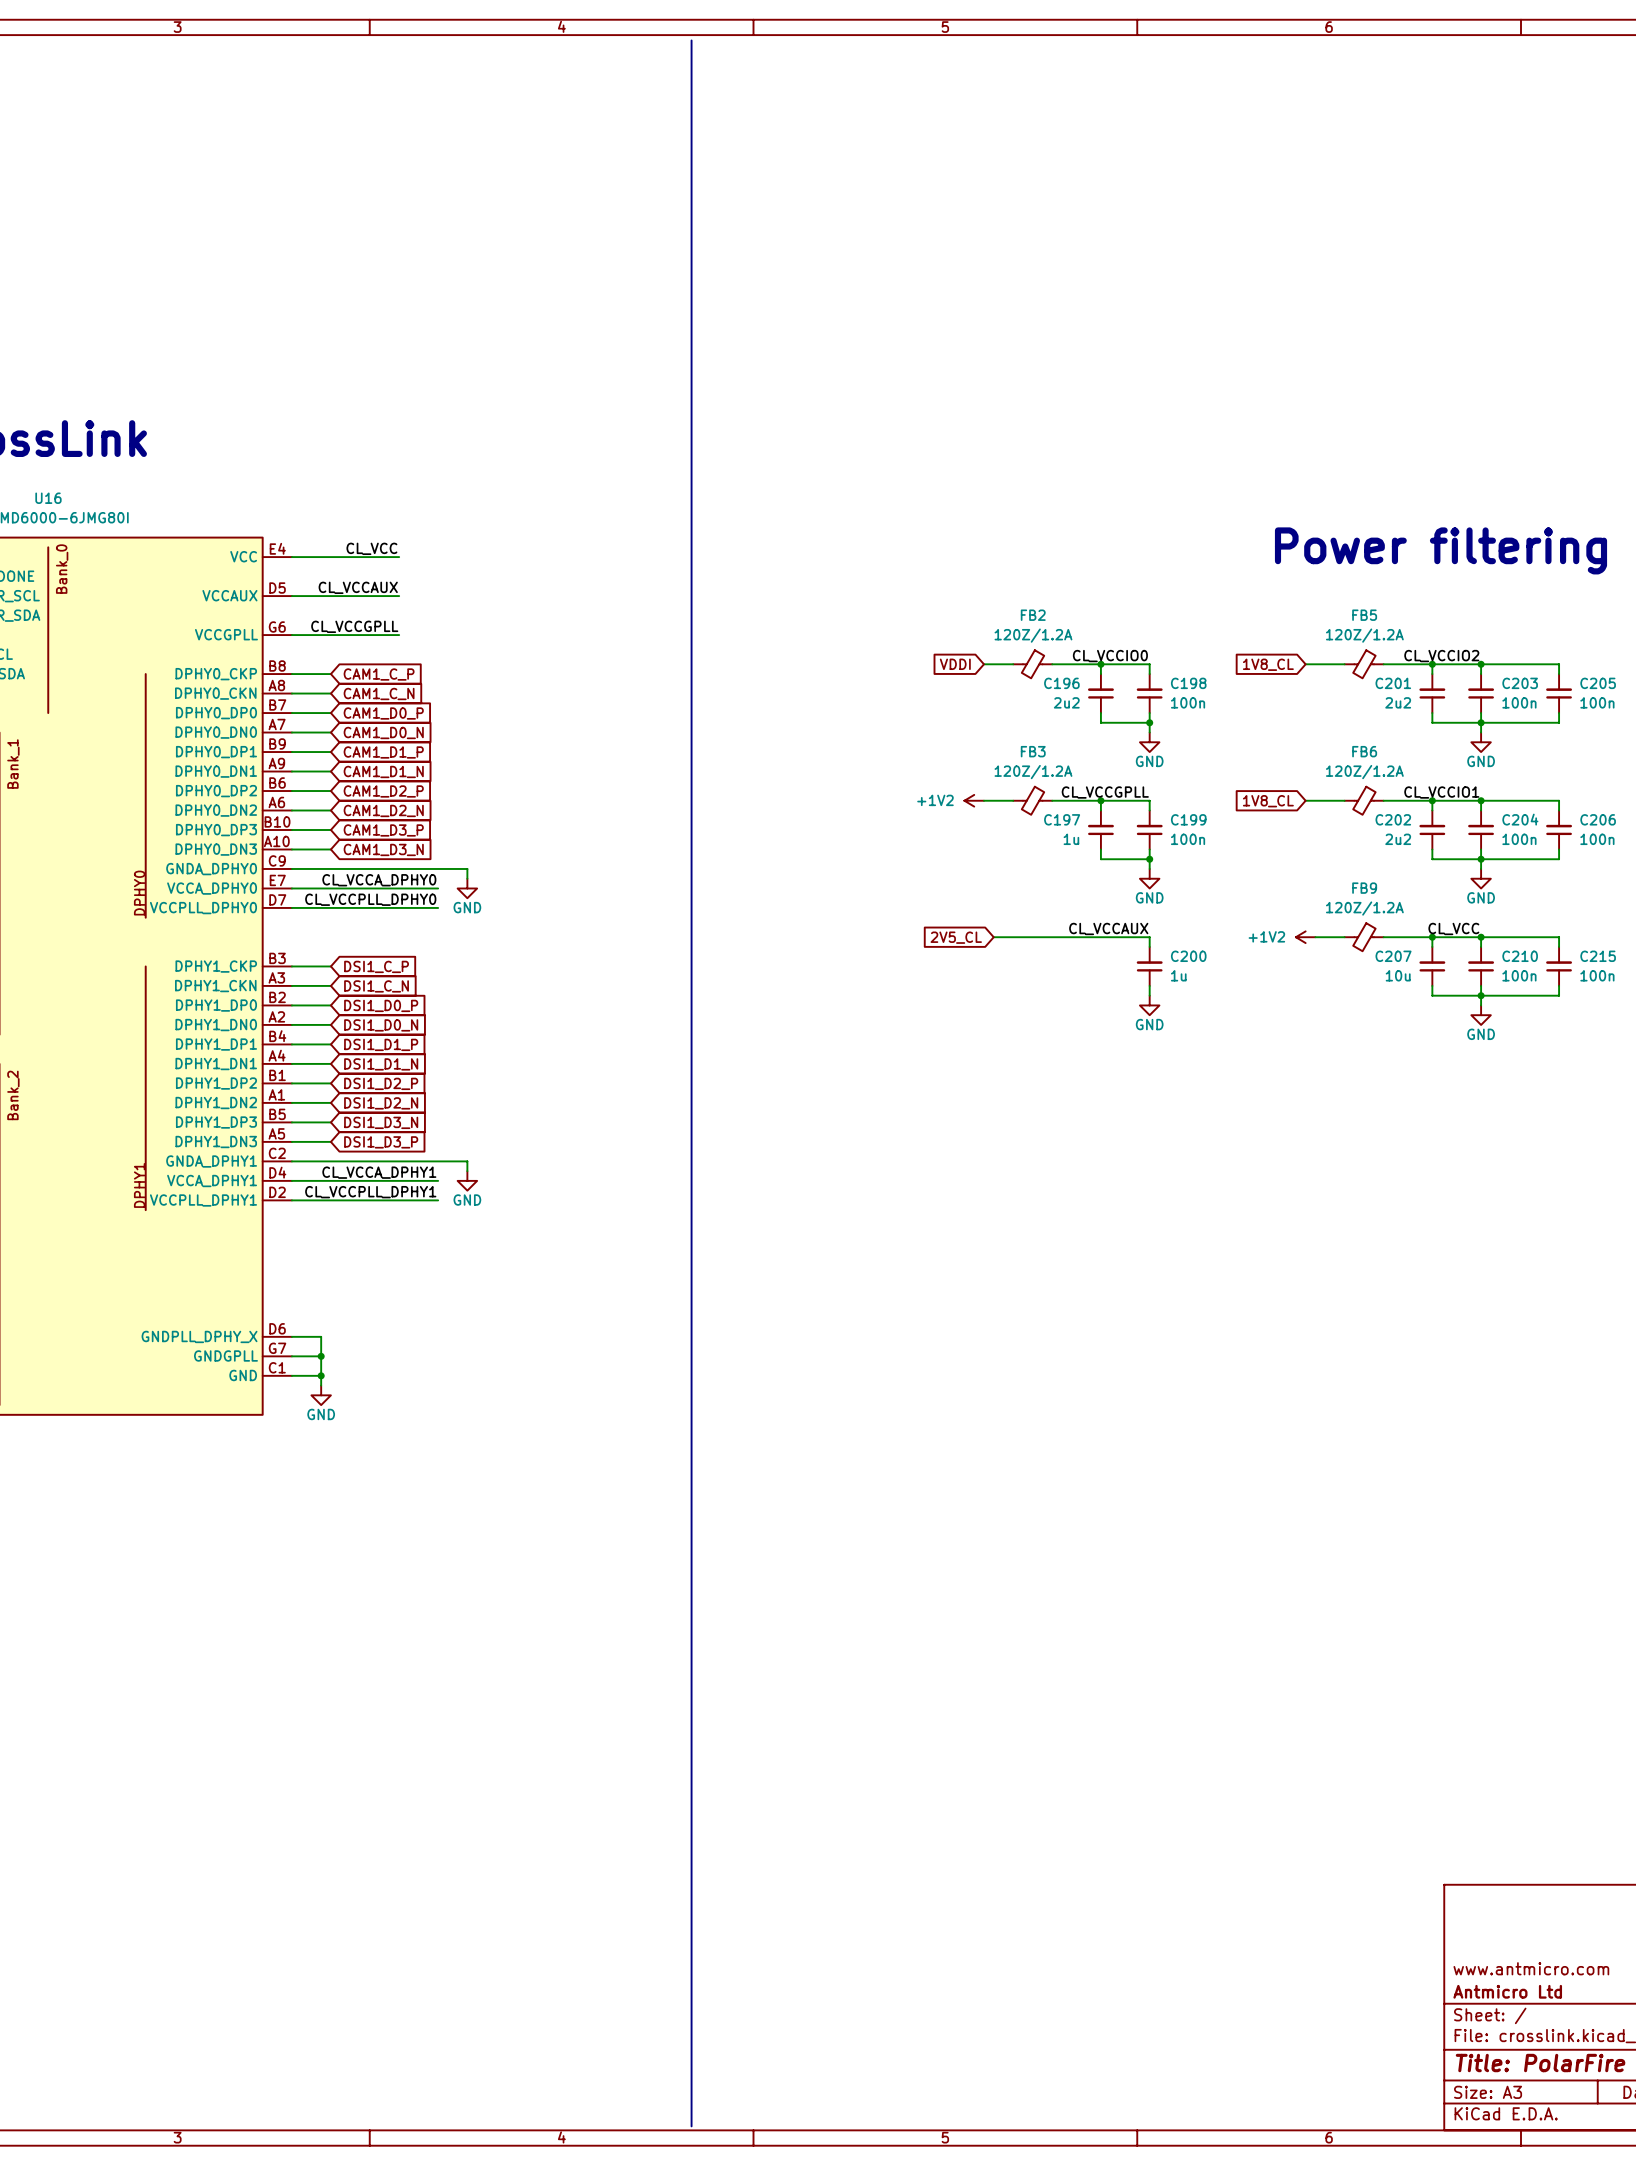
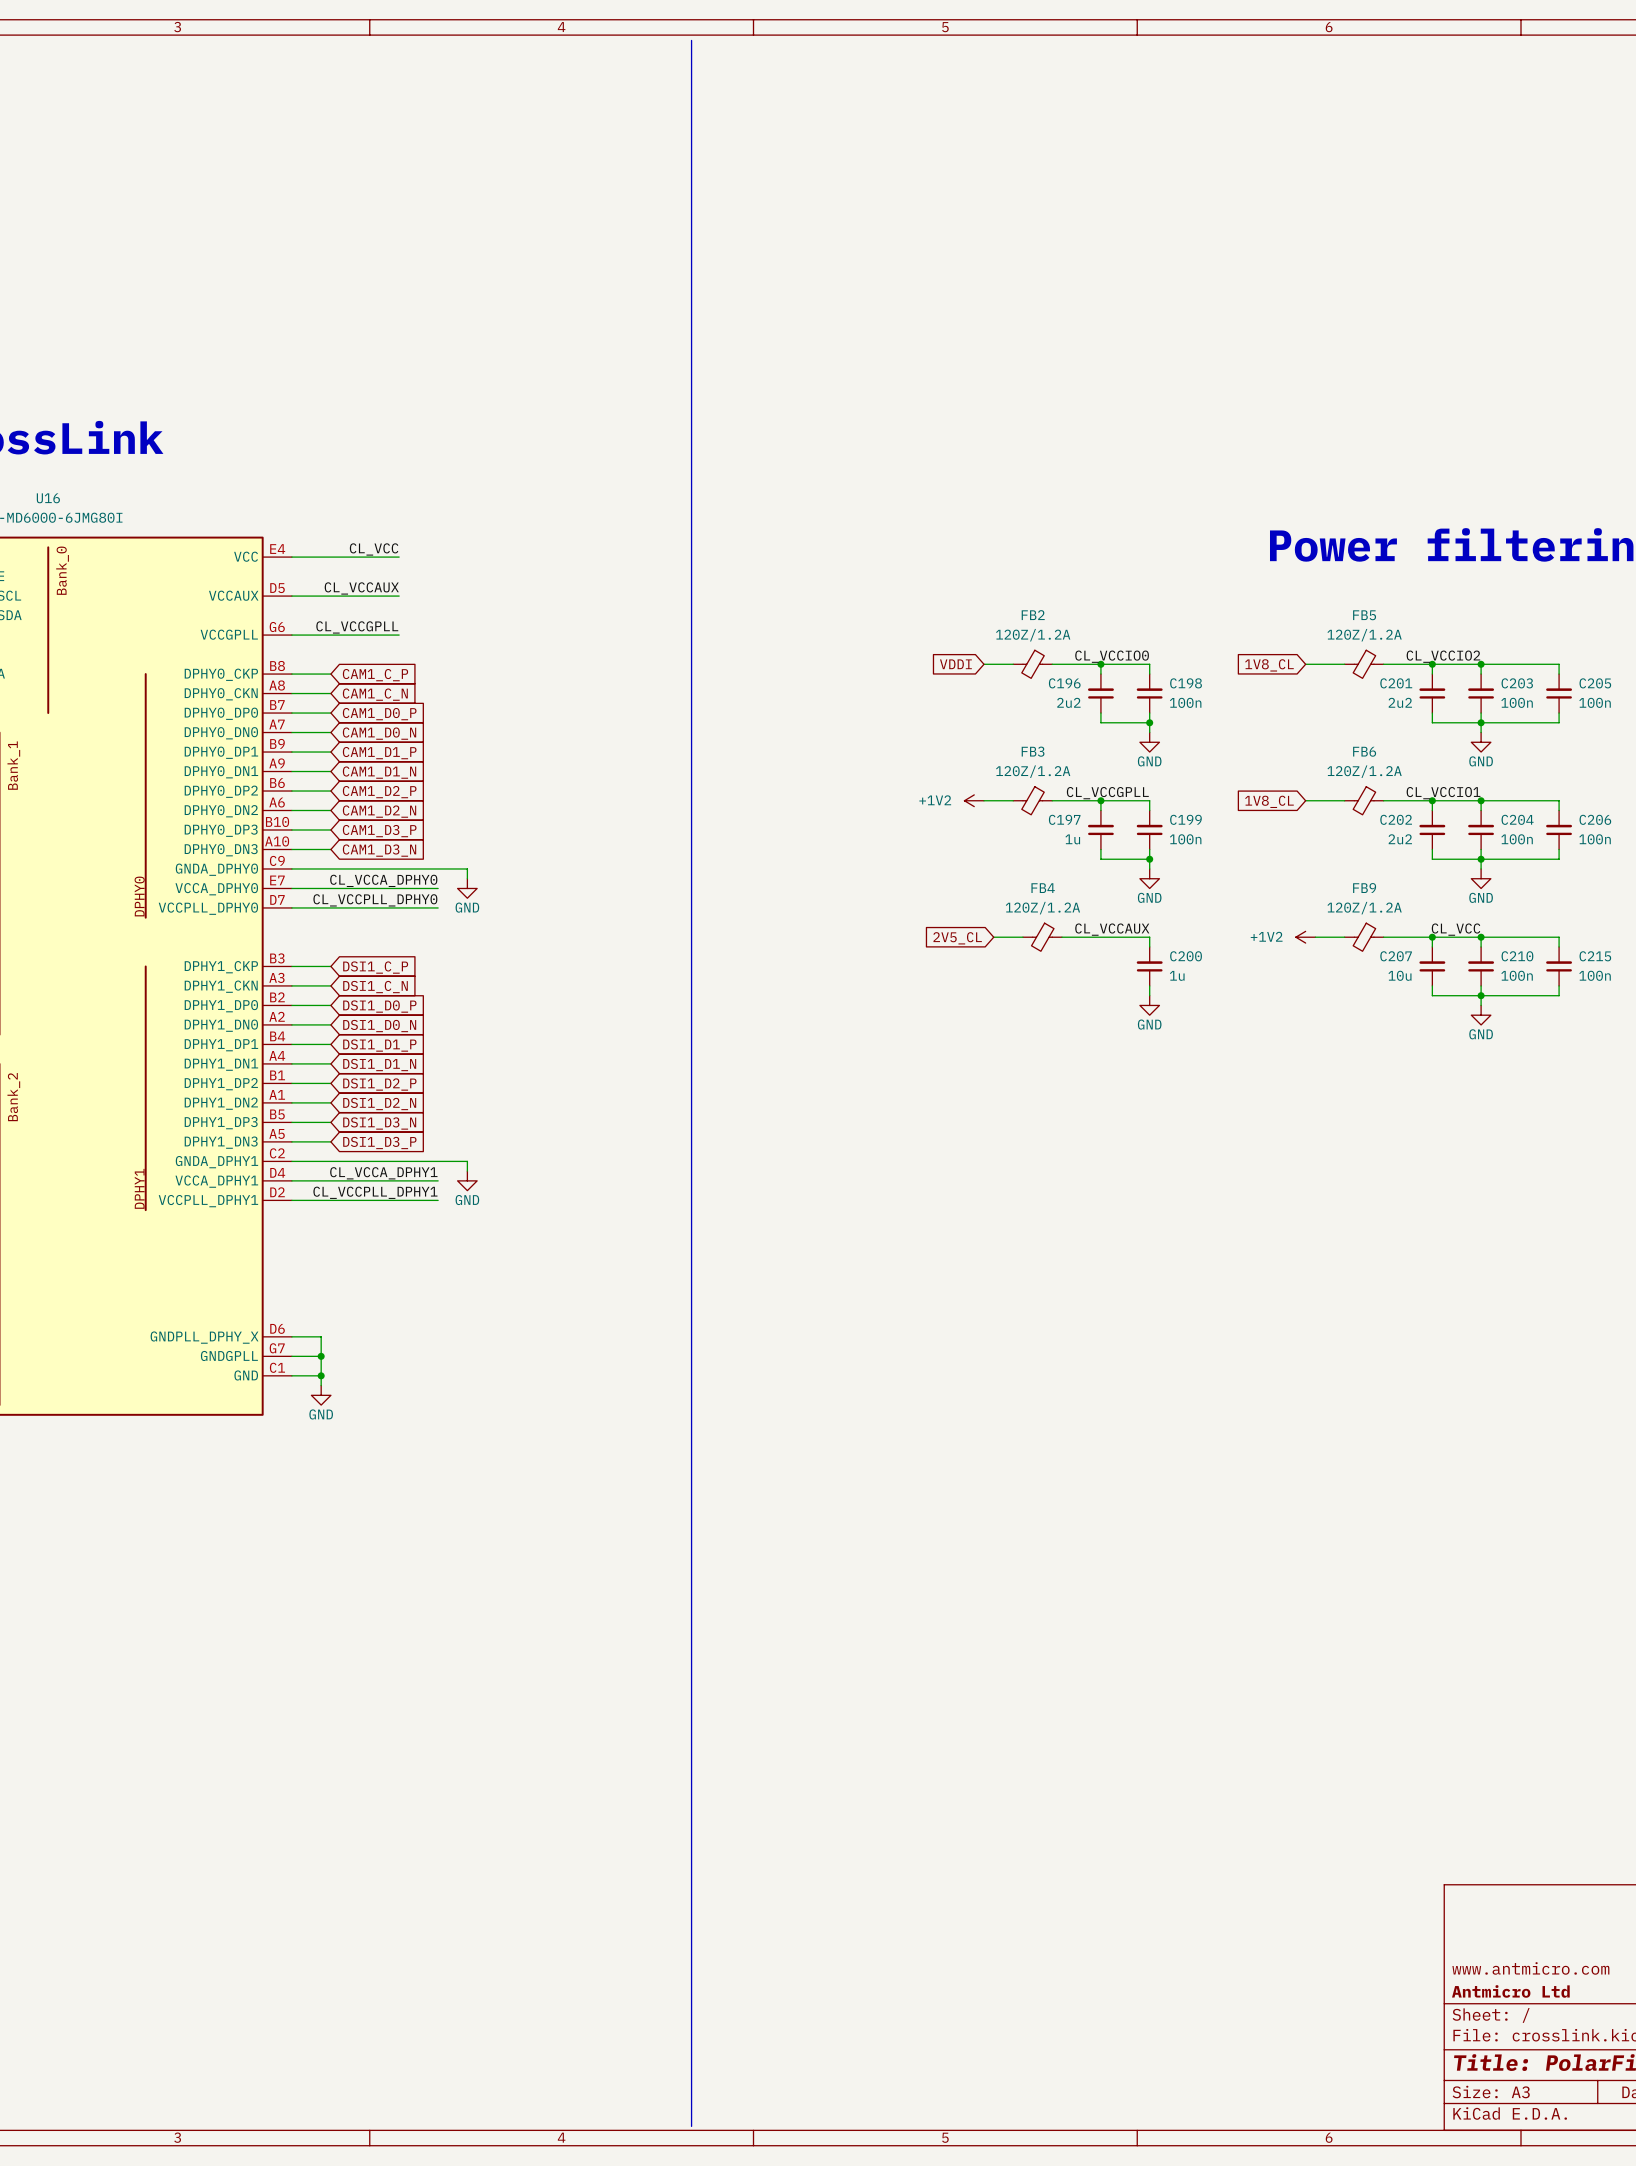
FB4: none -> (1042, 937)

